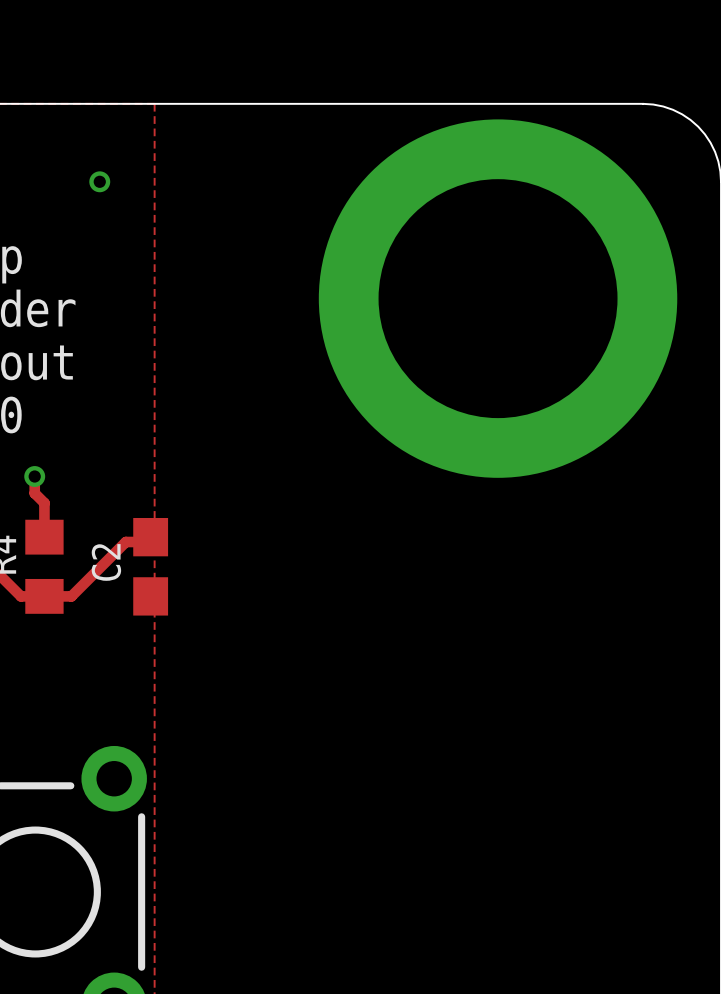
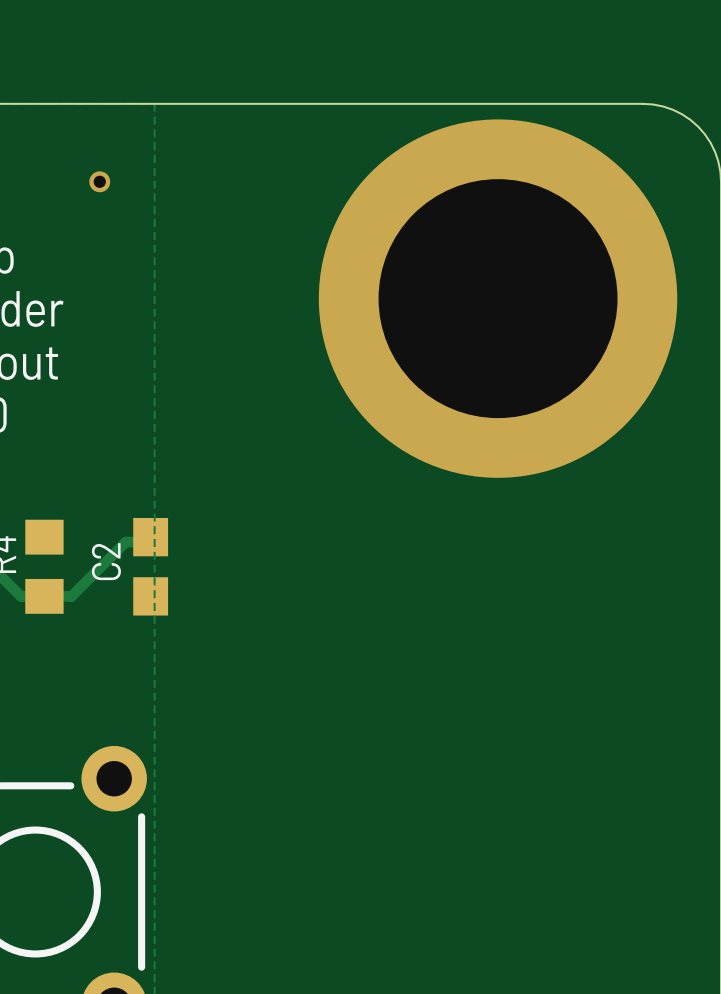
track: (34, 476) (34, 493) (44, 503) (44, 537) -> none
via: (34, 476) -> none

